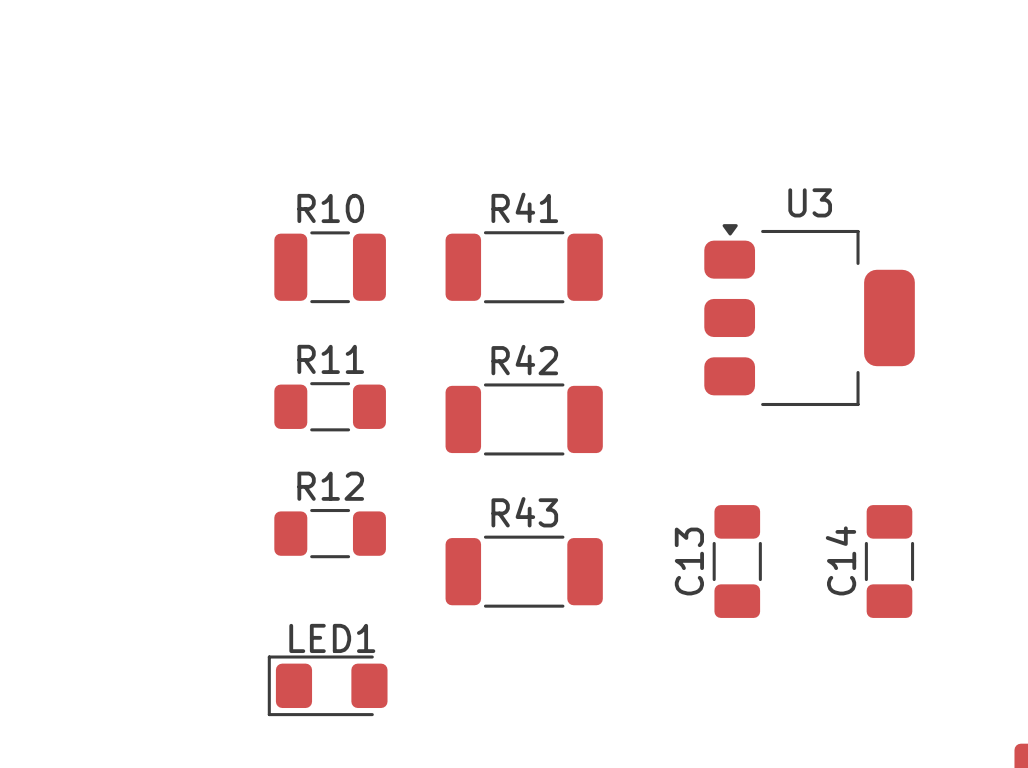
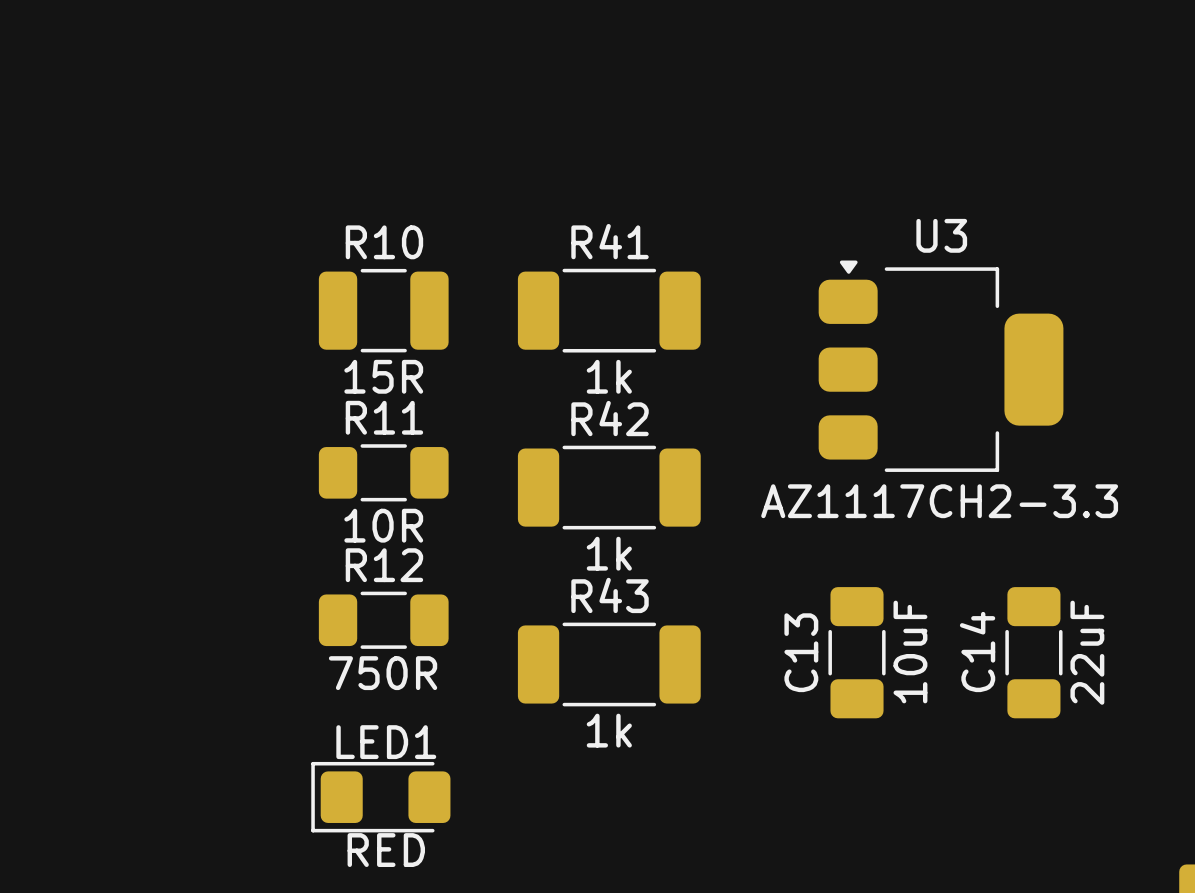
R10 value: none -> 15R (383, 376)
R41 value: none -> 1k (609, 376)
U3 value: none -> AZ1117CH2-3.3 (939, 501)
R11 value: none -> 10R (383, 525)
R42 value: none -> 1k (609, 553)
C13 value: none -> 10uF (910, 652)
C14 value: none -> 22uF (1087, 652)
R12 value: none -> 750R (383, 673)
R43 value: none -> 1k (609, 730)
LED1 value: none -> RED (386, 850)

